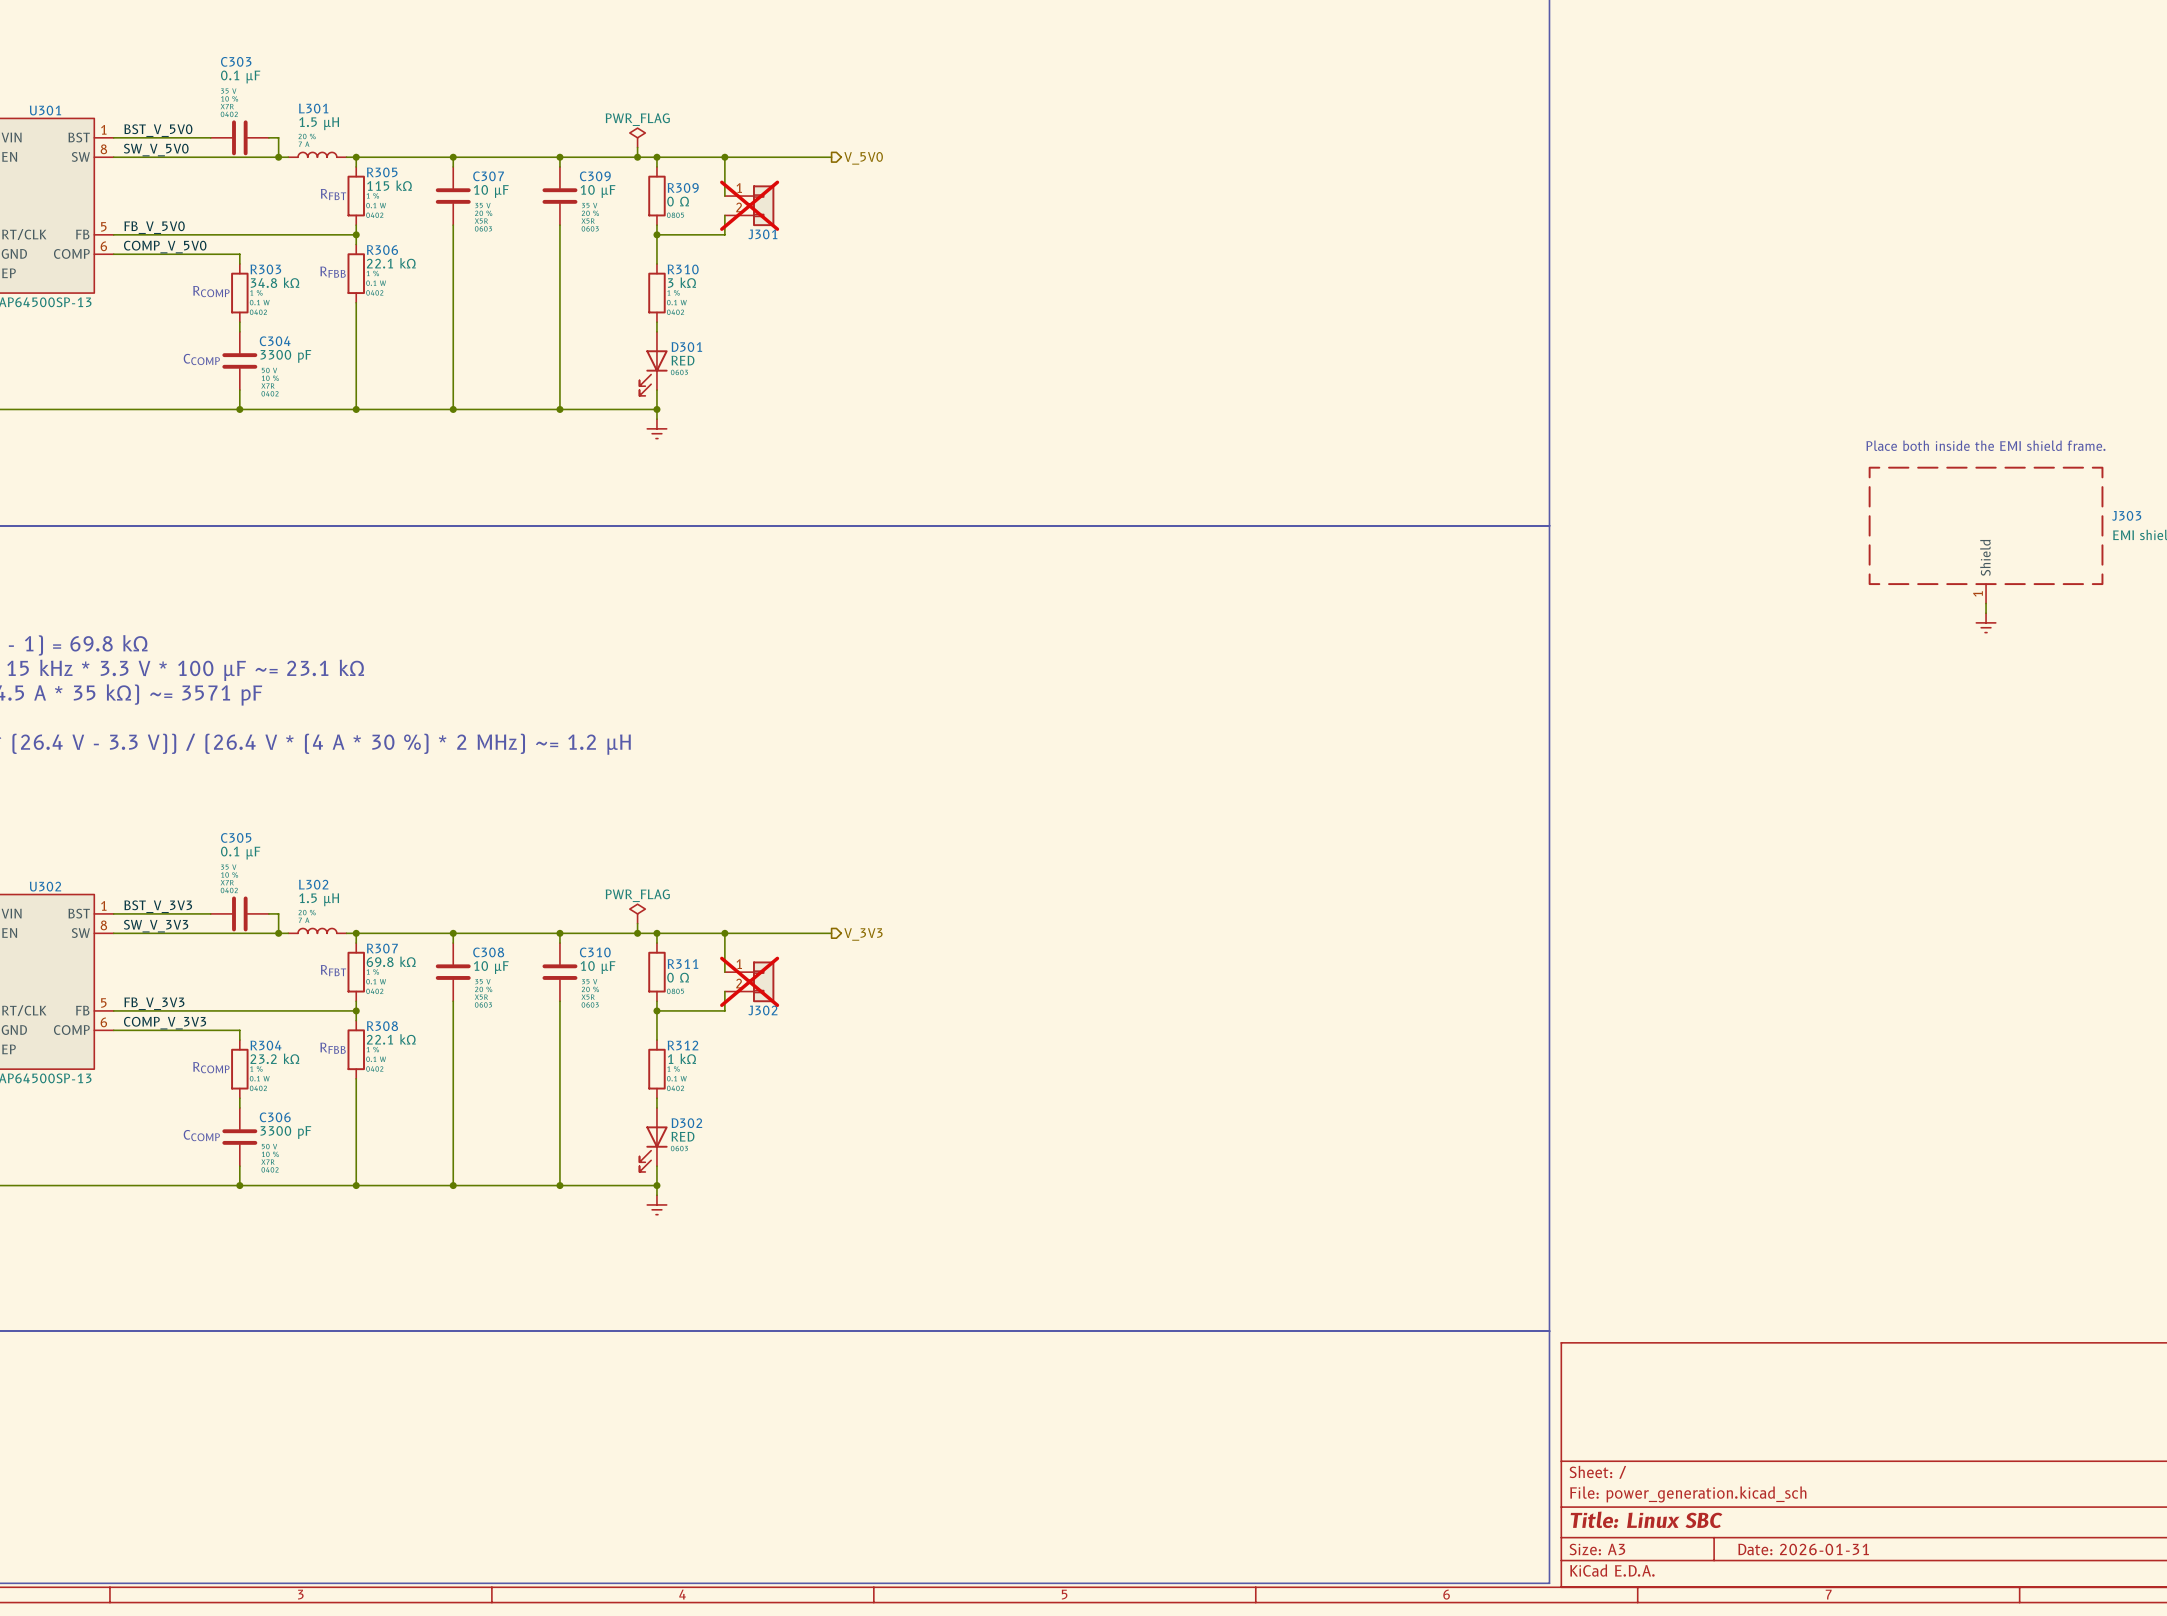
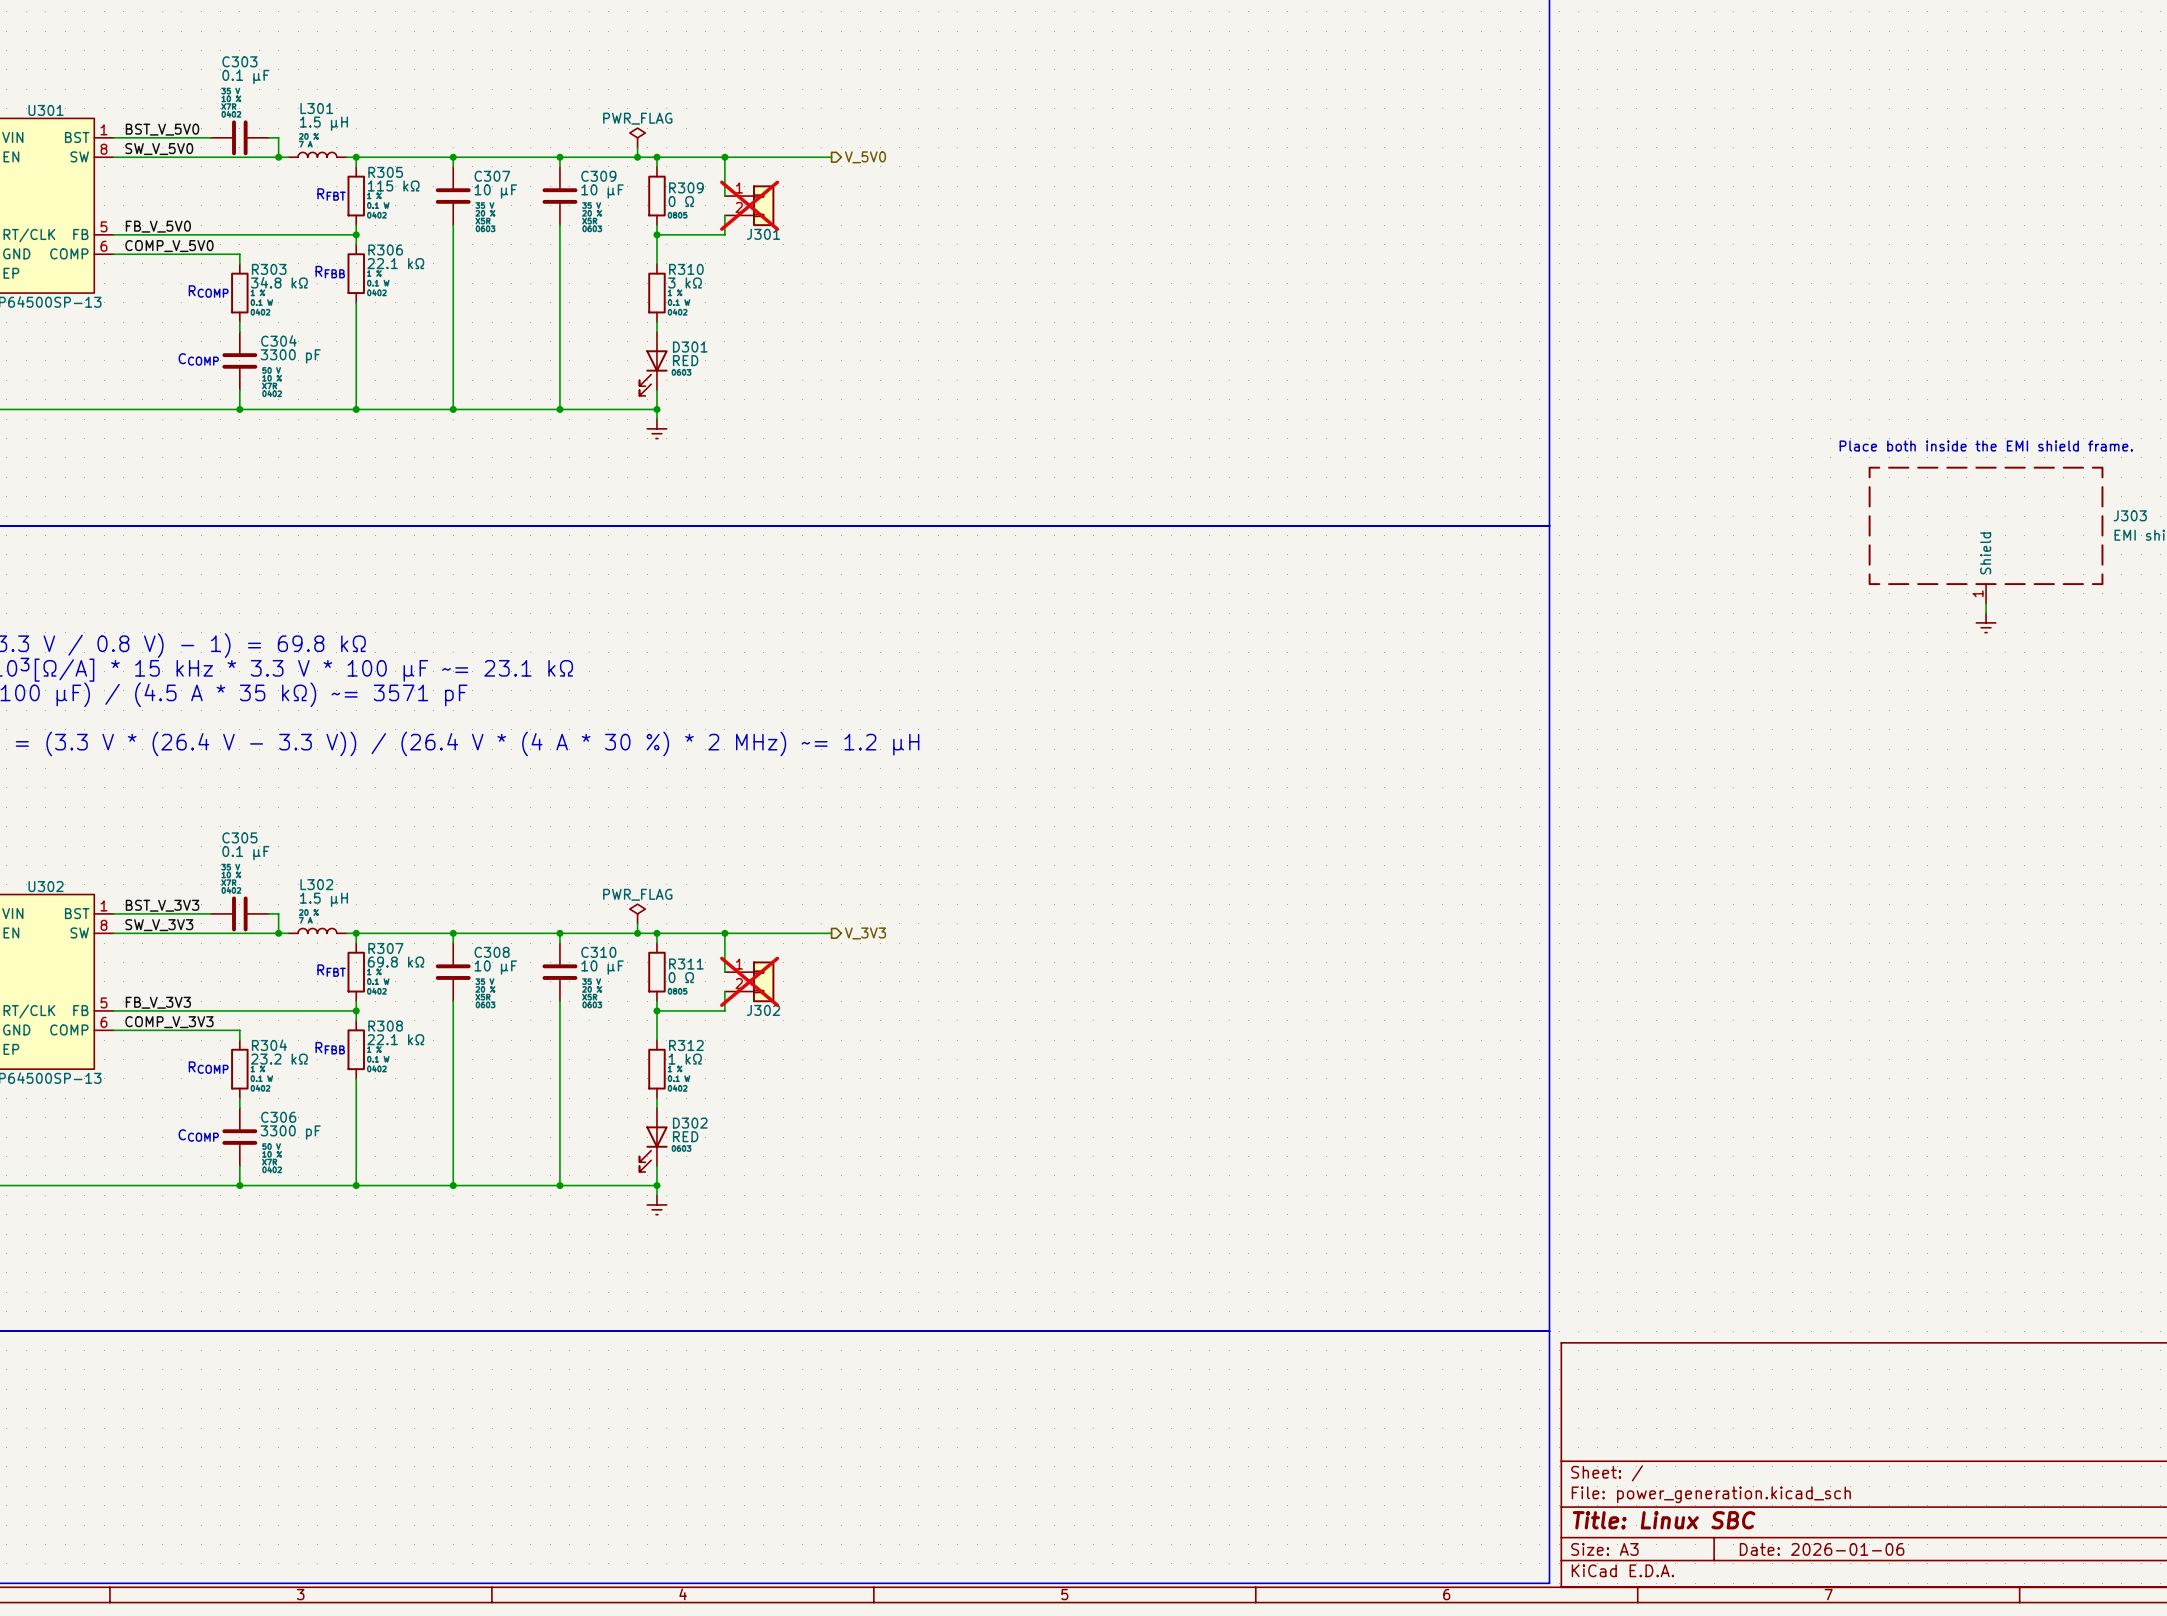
title block: Date: 2026-01-31 (1803, 1549) -> Date: 2026-01-06 (1822, 1549)

